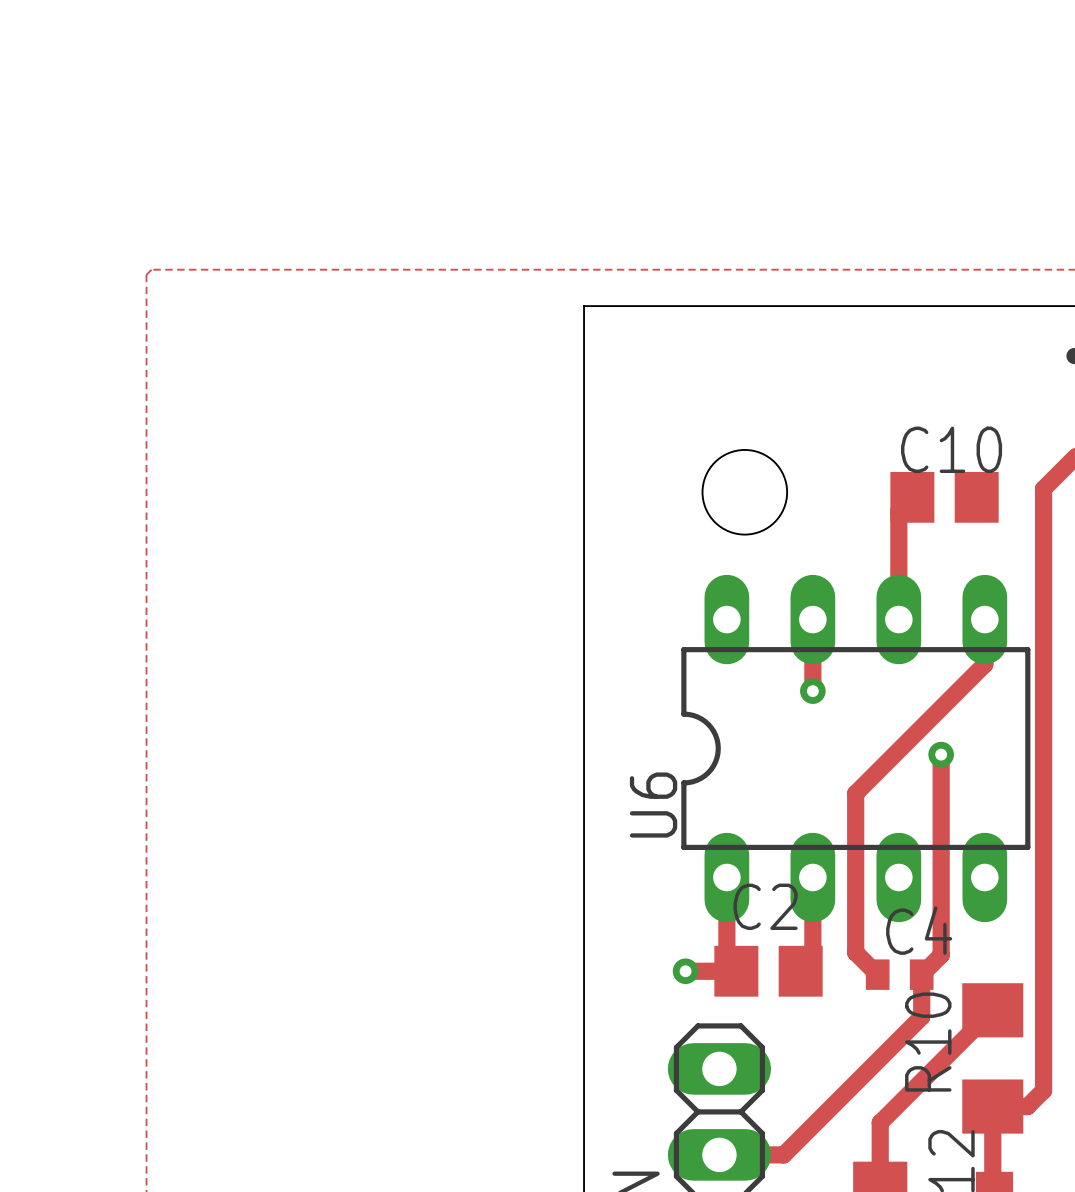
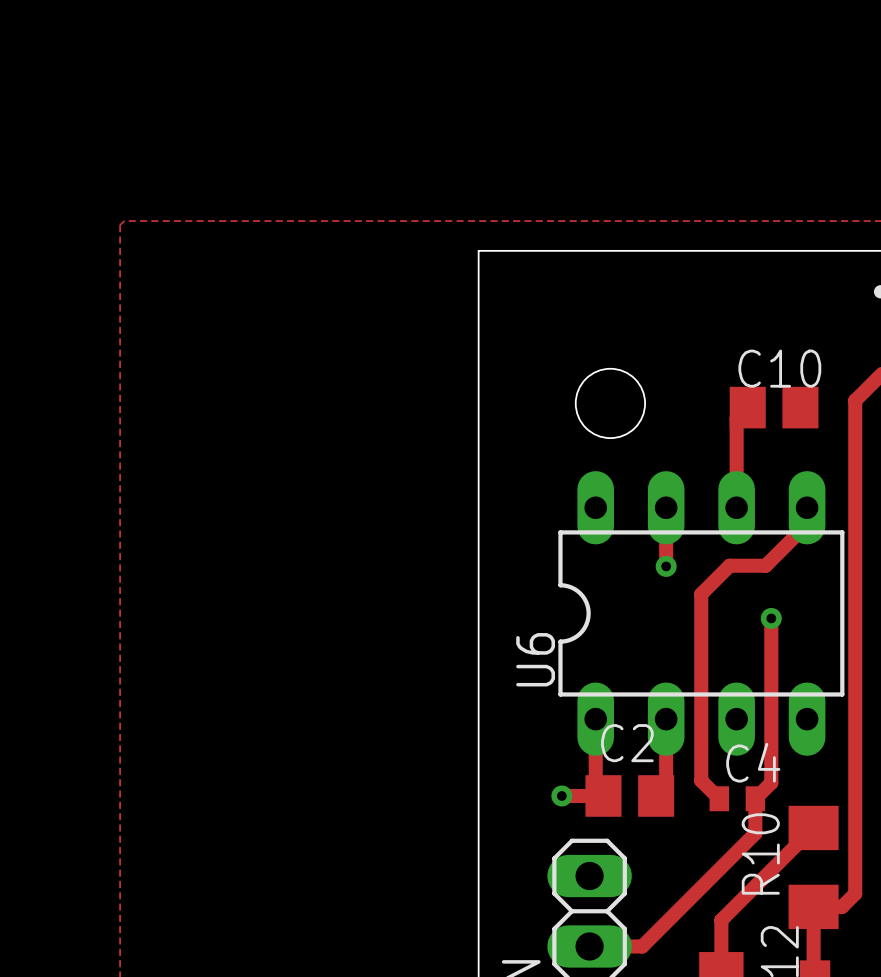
track: (984, 639) (984, 664) (855, 793) -> (807, 524) (765, 565) (729, 565) (701, 594) (701, 650)

